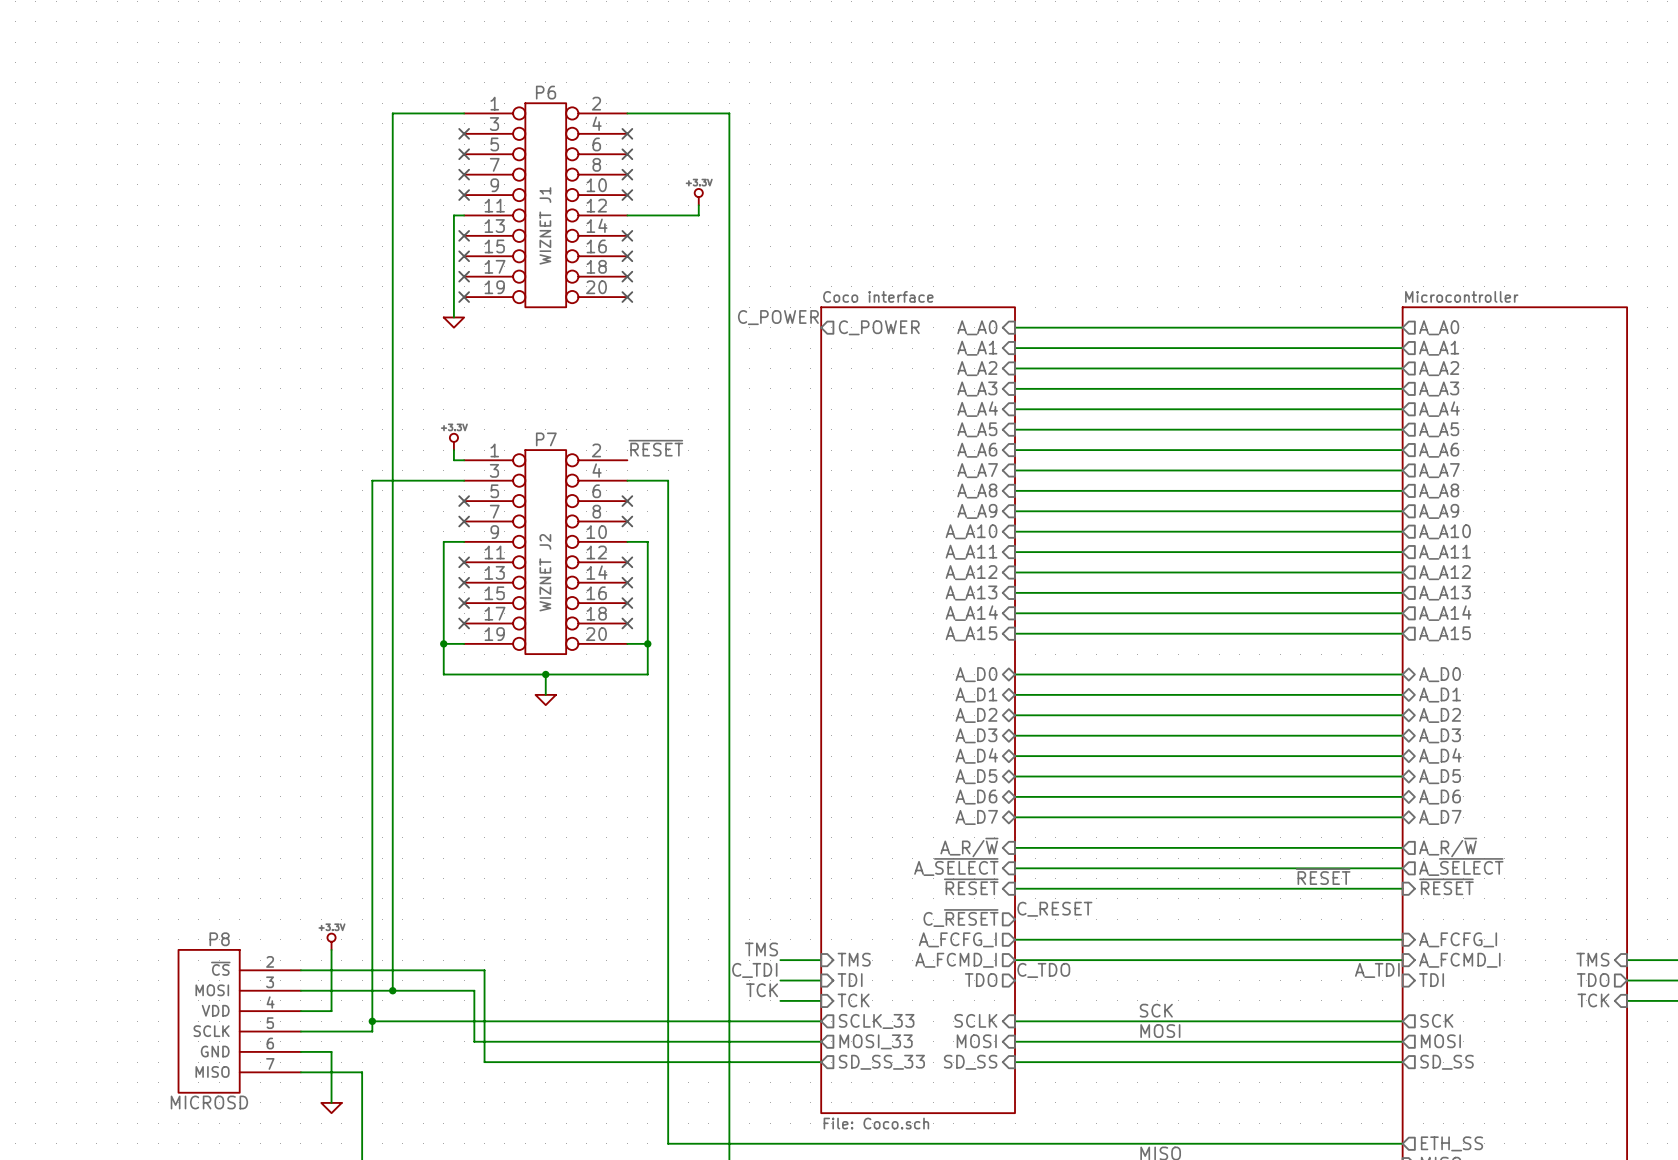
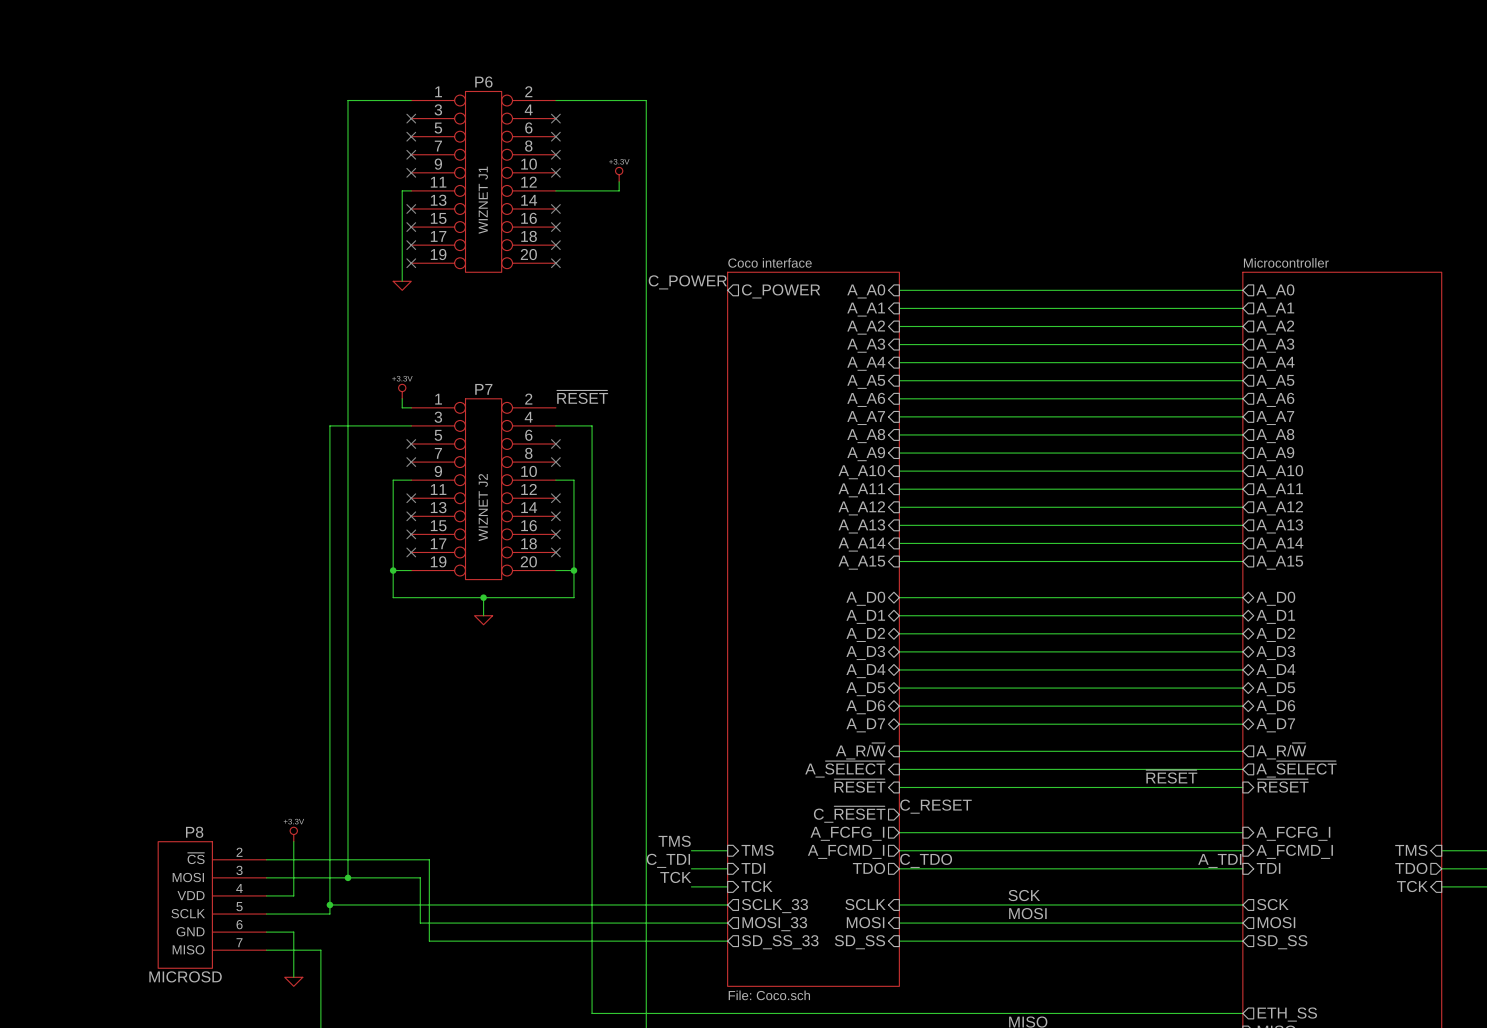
wire: none -> (899, 868) (1242, 868)

